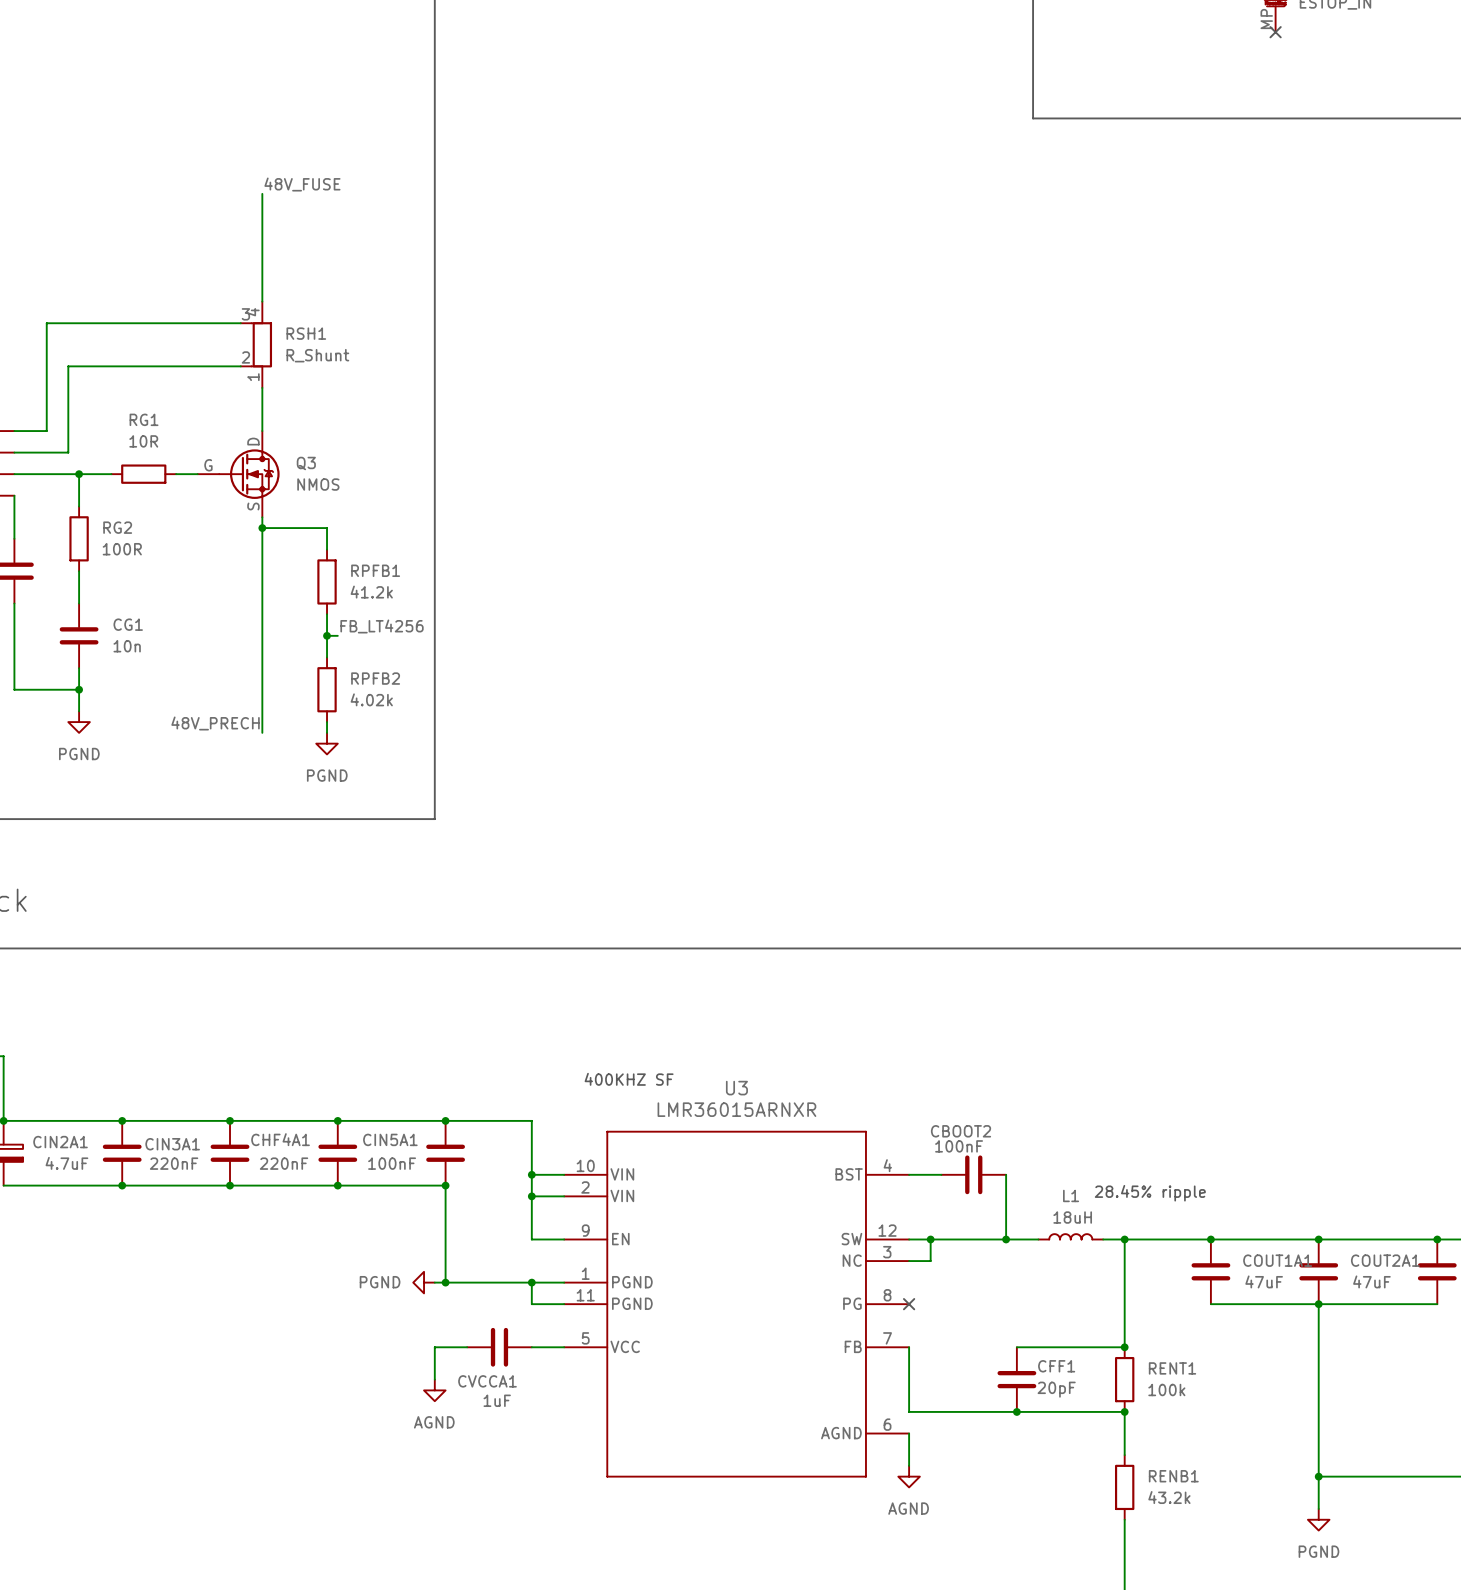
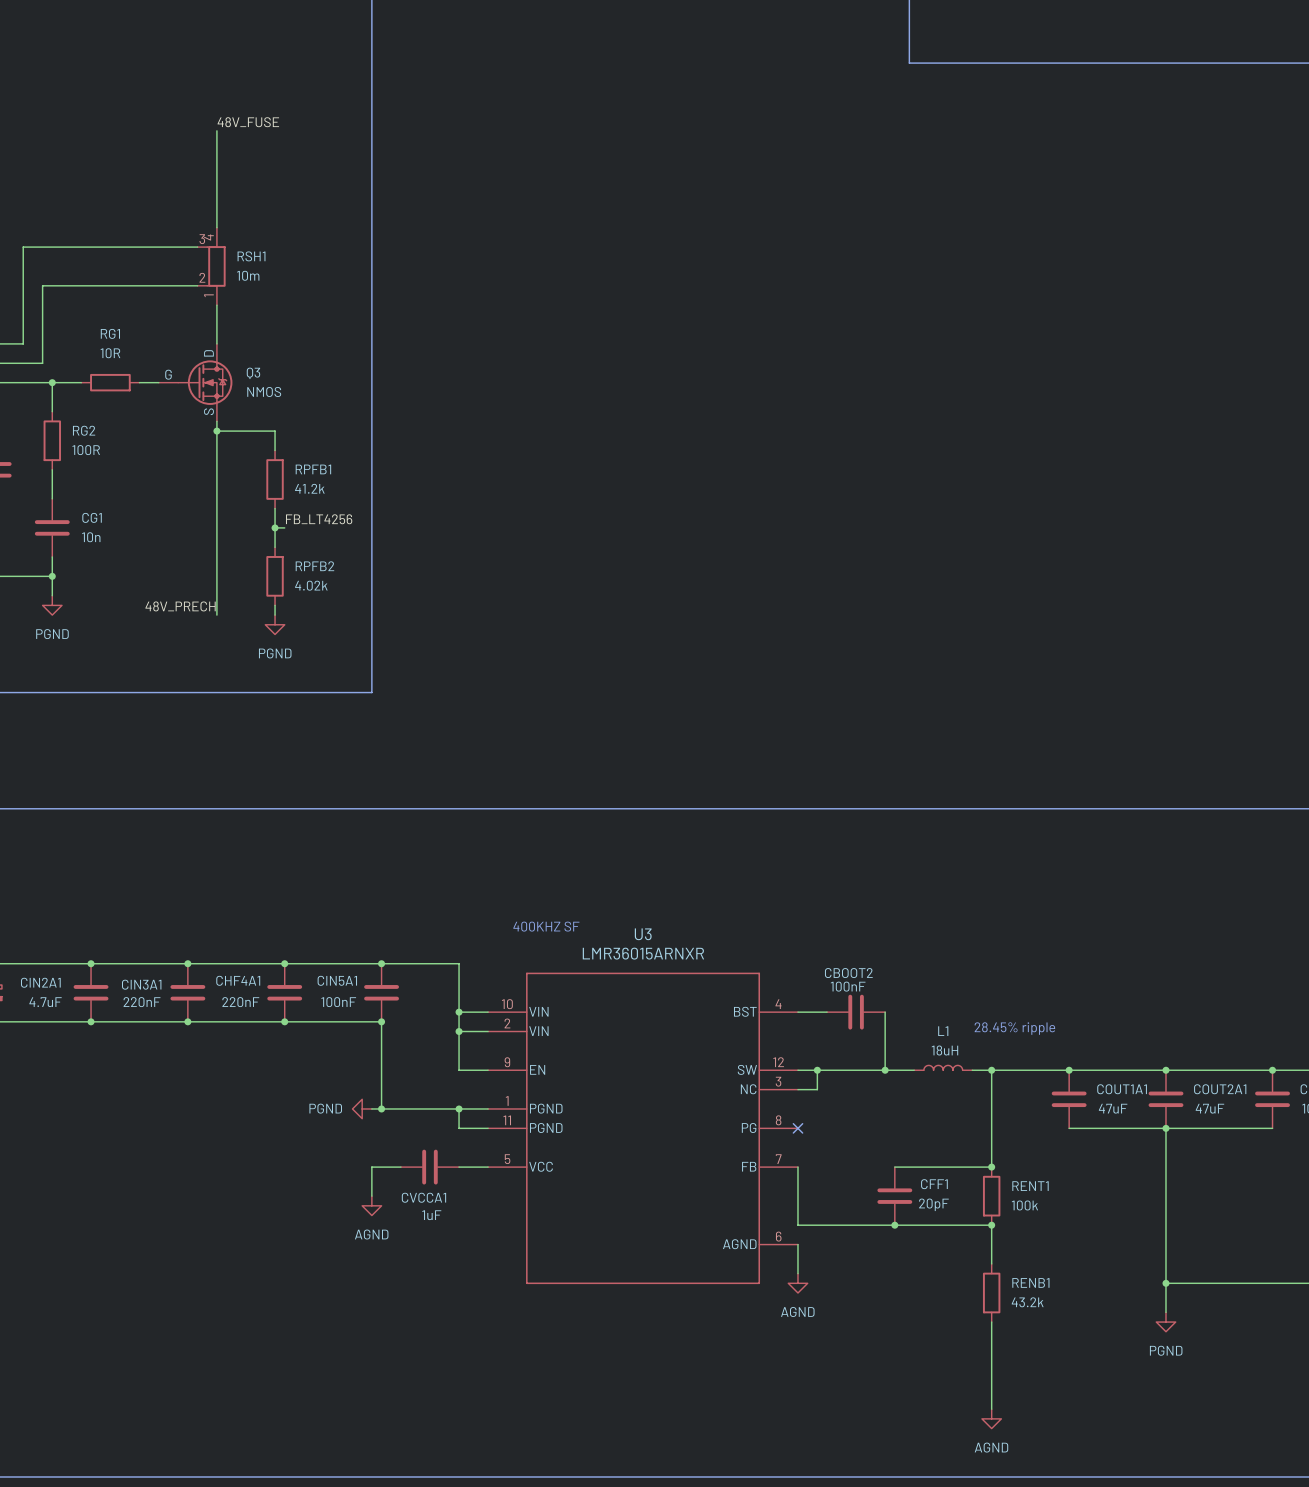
RSH1 value: R_Shunt (317, 355) -> 10m (248, 275)

